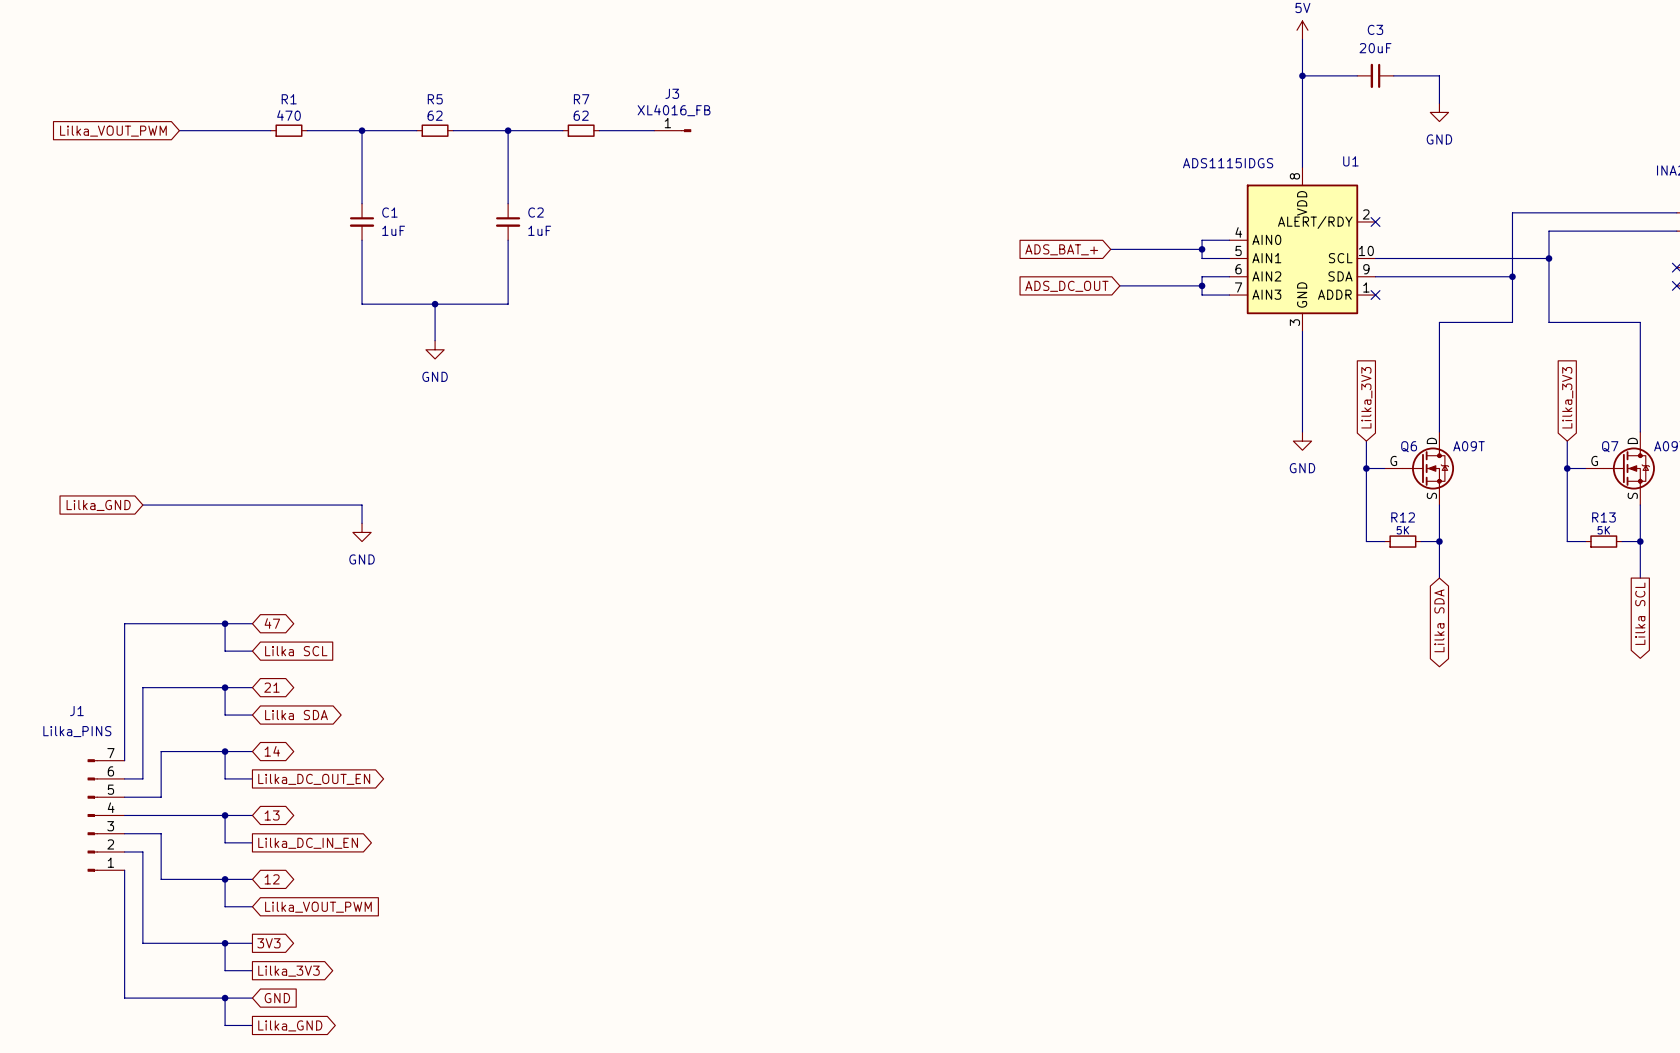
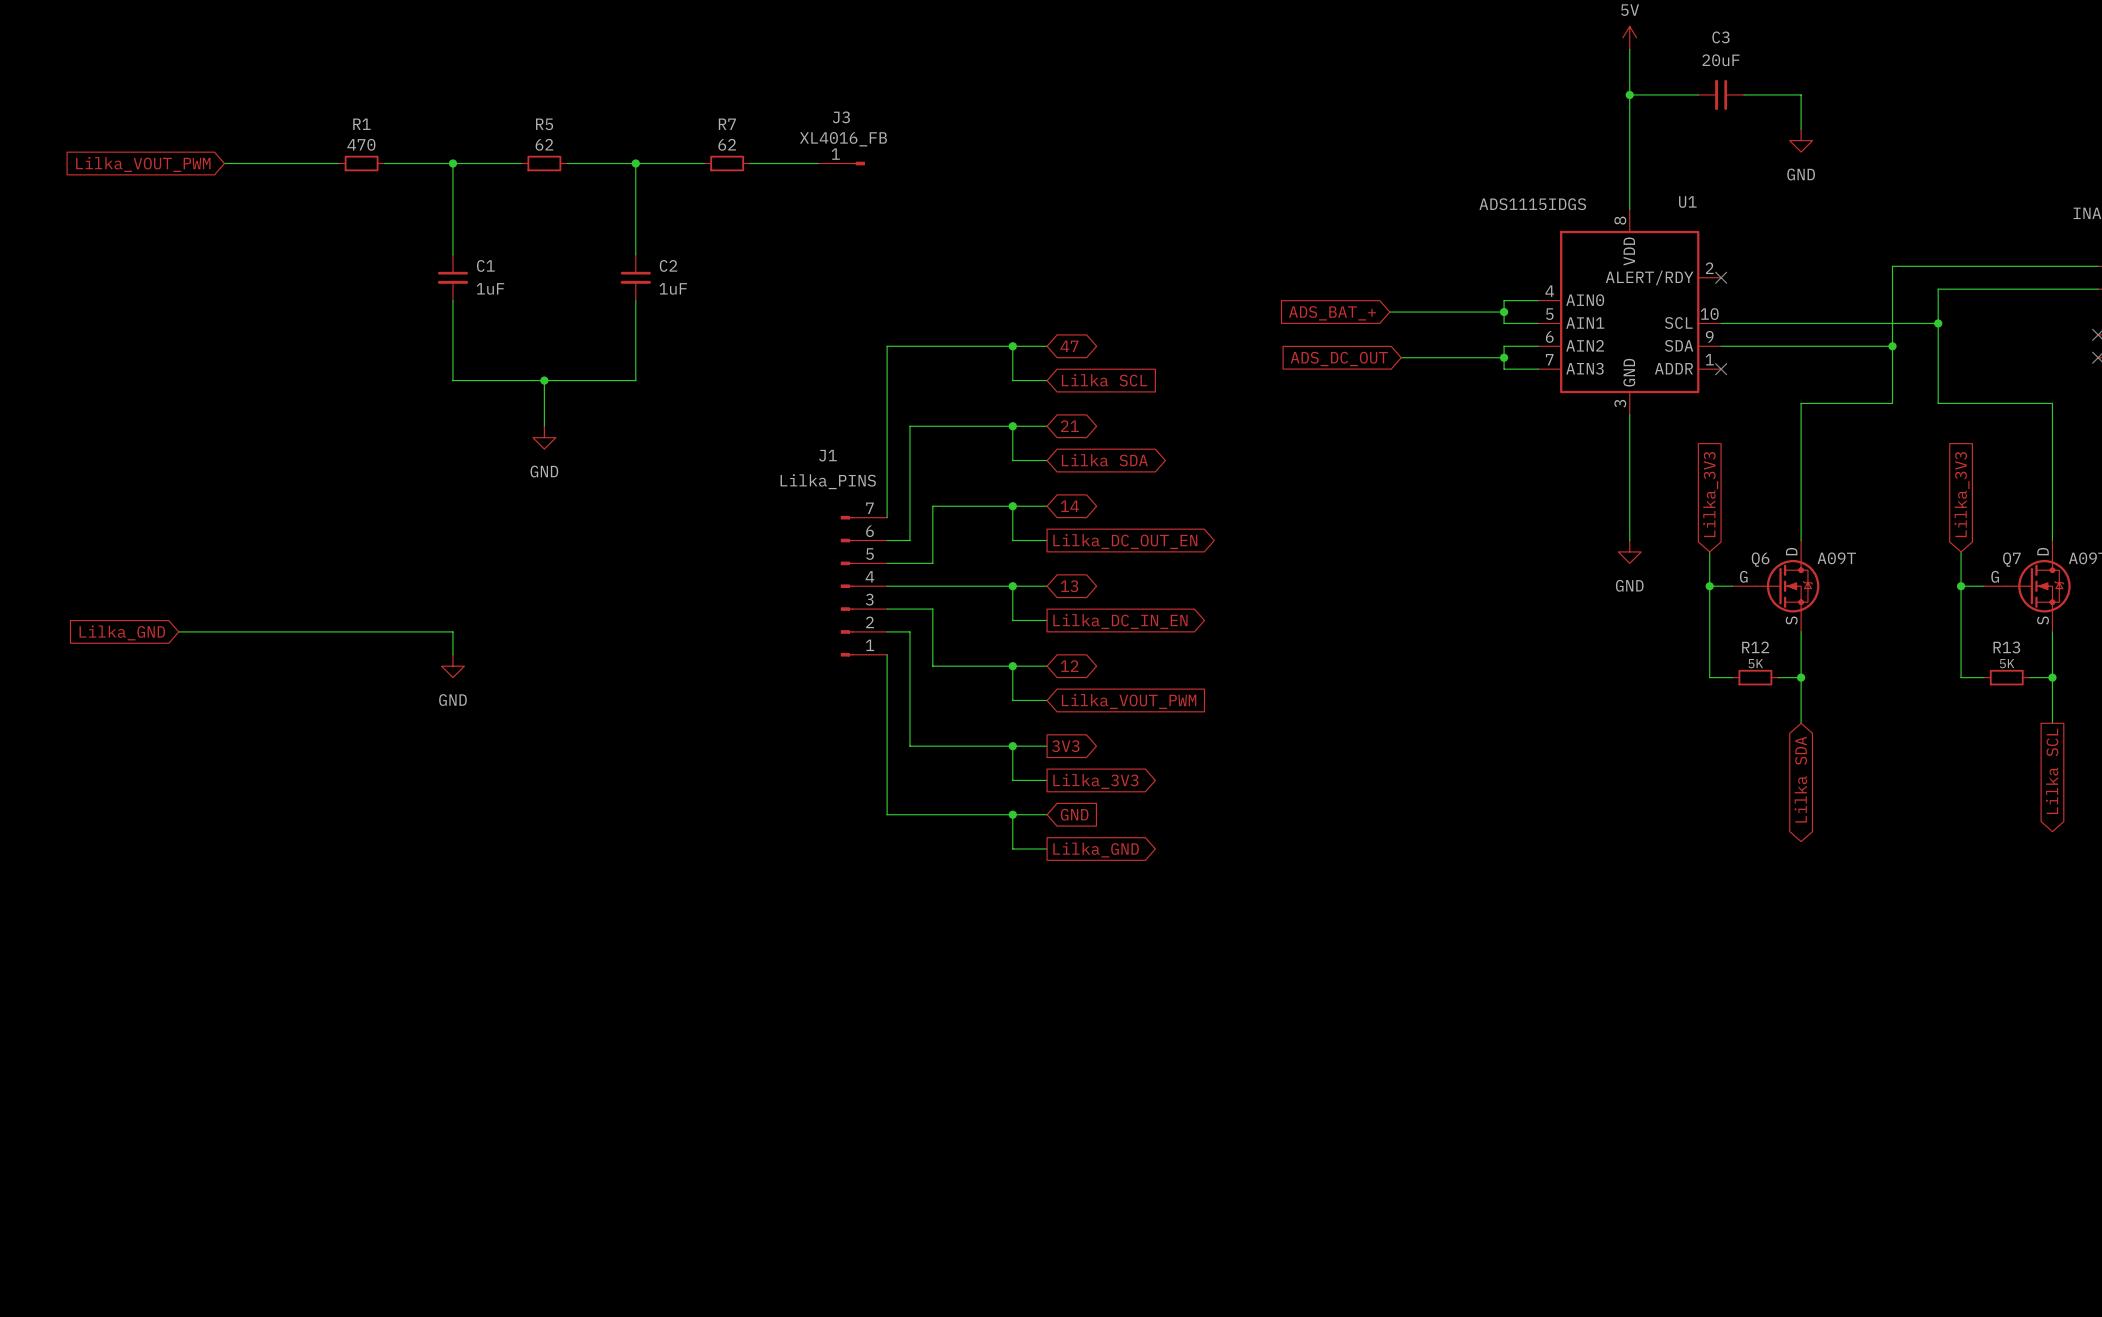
wire: none -> (1012, 346) (1012, 380) (1047, 380)
junction: none -> (1012, 346)
wire: none -> (1047, 346) (887, 346) (887, 517)
global label: none -> 47 (1069, 346)
global label: none -> Lilka SCL (1104, 380)
wire: none -> (1012, 426) (1012, 460) (1047, 460)
junction: none -> (1012, 426)
wire: none -> (1047, 426) (909, 426) (909, 540) (887, 540)
global label: none -> 21 (1069, 426)
global label: none -> Lilka SDA (1104, 460)
wire: none -> (1012, 506) (1012, 540) (1047, 540)
junction: none -> (1012, 506)
wire: none -> (1047, 506) (932, 506) (932, 563) (887, 563)
global label: none -> 14 (1069, 506)
global label: none -> Lilka_DC_OUT_EN (1125, 541)
wire: none -> (887, 586) (1047, 586)
wire: none -> (1012, 586) (1012, 620) (1047, 620)
junction: none -> (1012, 586)
global label: none -> 13 (1069, 586)
wire: none -> (887, 609) (932, 609) (932, 666) (1047, 666)
global label: none -> Lilka_DC_IN_EN (1120, 621)
wire: none -> (887, 631) (909, 631) (909, 746) (1047, 746)
wire: none -> (887, 654) (887, 814) (1047, 814)
wire: none -> (1012, 666) (1012, 700) (1047, 700)
junction: none -> (1012, 666)
global label: none -> 12 (1069, 666)
global label: none -> Lilka_VOUT_PWM (1129, 701)
wire: none -> (1012, 746) (1012, 780) (1047, 780)
junction: none -> (1012, 746)
global label: none -> 3V3 (1065, 746)
wire: (225, 623) (225, 651) (252, 651) -> none
junction: (225, 623) -> none
wire: (252, 623) (124, 623) (124, 760) -> none
global label: 47 (272, 623) -> none
global label: none -> Lilka_3V3 (1095, 781)
global label: Lilka SCL (296, 651) -> none
wire: none -> (1012, 814) (1012, 848) (1047, 848)
junction: none -> (1012, 814)
global label: none -> GND (1074, 814)
global label: none -> Lilka_GND (1096, 849)
wire: (225, 687) (225, 715) (252, 715) -> none
junction: (225, 687) -> none
wire: (252, 687) (142, 687) (142, 778) (124, 778) -> none
global label: 21 (271, 687) -> none
global label: Lilka SDA (296, 715) -> none
wire: (225, 751) (225, 778) (252, 778) -> none
junction: (225, 751) -> none
wire: (252, 751) (161, 751) (161, 797) (124, 797) -> none
global label: 14 (272, 751) -> none
global label: Lilka_DC_OUT_EN (314, 779) -> none
J1 position: (106, 815) -> (863, 586)
wire: (124, 815) (252, 815) -> none
wire: (225, 815) (225, 842) (252, 842) -> none
junction: (225, 815) -> none
global label: 13 (272, 815) -> none
wire: (124, 833) (161, 833) (161, 879) (252, 879) -> none
global label: Lilka_DC_IN_EN (308, 843) -> none
wire: (124, 851) (142, 851) (142, 943) (252, 943) -> none
wire: (124, 870) (124, 998) (252, 998) -> none
wire: (225, 879) (225, 906) (252, 906) -> none
junction: (225, 879) -> none
global label: 12 (272, 879) -> none
global label: Lilka_VOUT_PWM (318, 907) -> none
wire: (225, 943) (225, 970) (252, 970) -> none
junction: (225, 943) -> none
global label: 3V3 (268, 943) -> none
global label: Lilka_3V3 (288, 971) -> none
wire: (225, 998) (225, 1025) (252, 1025) -> none
junction: (225, 998) -> none
global label: GND (277, 998) -> none
global label: Lilka_GND (290, 1025) -> none

